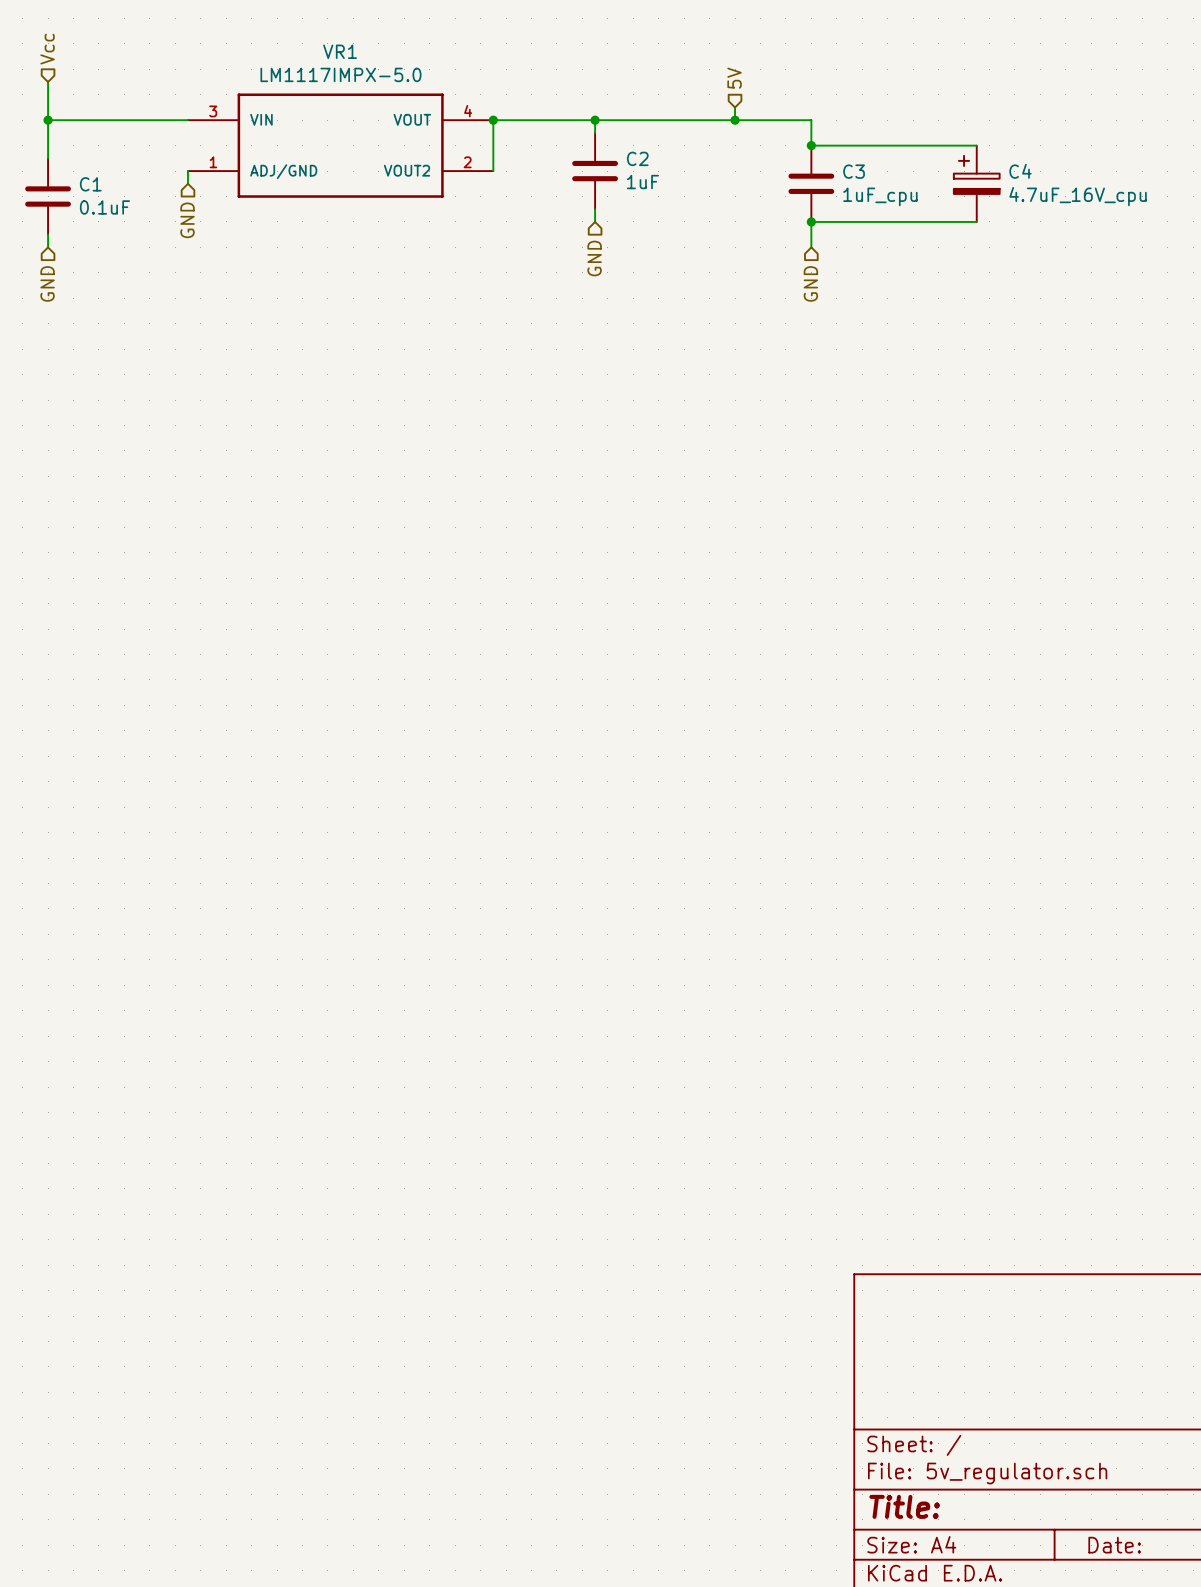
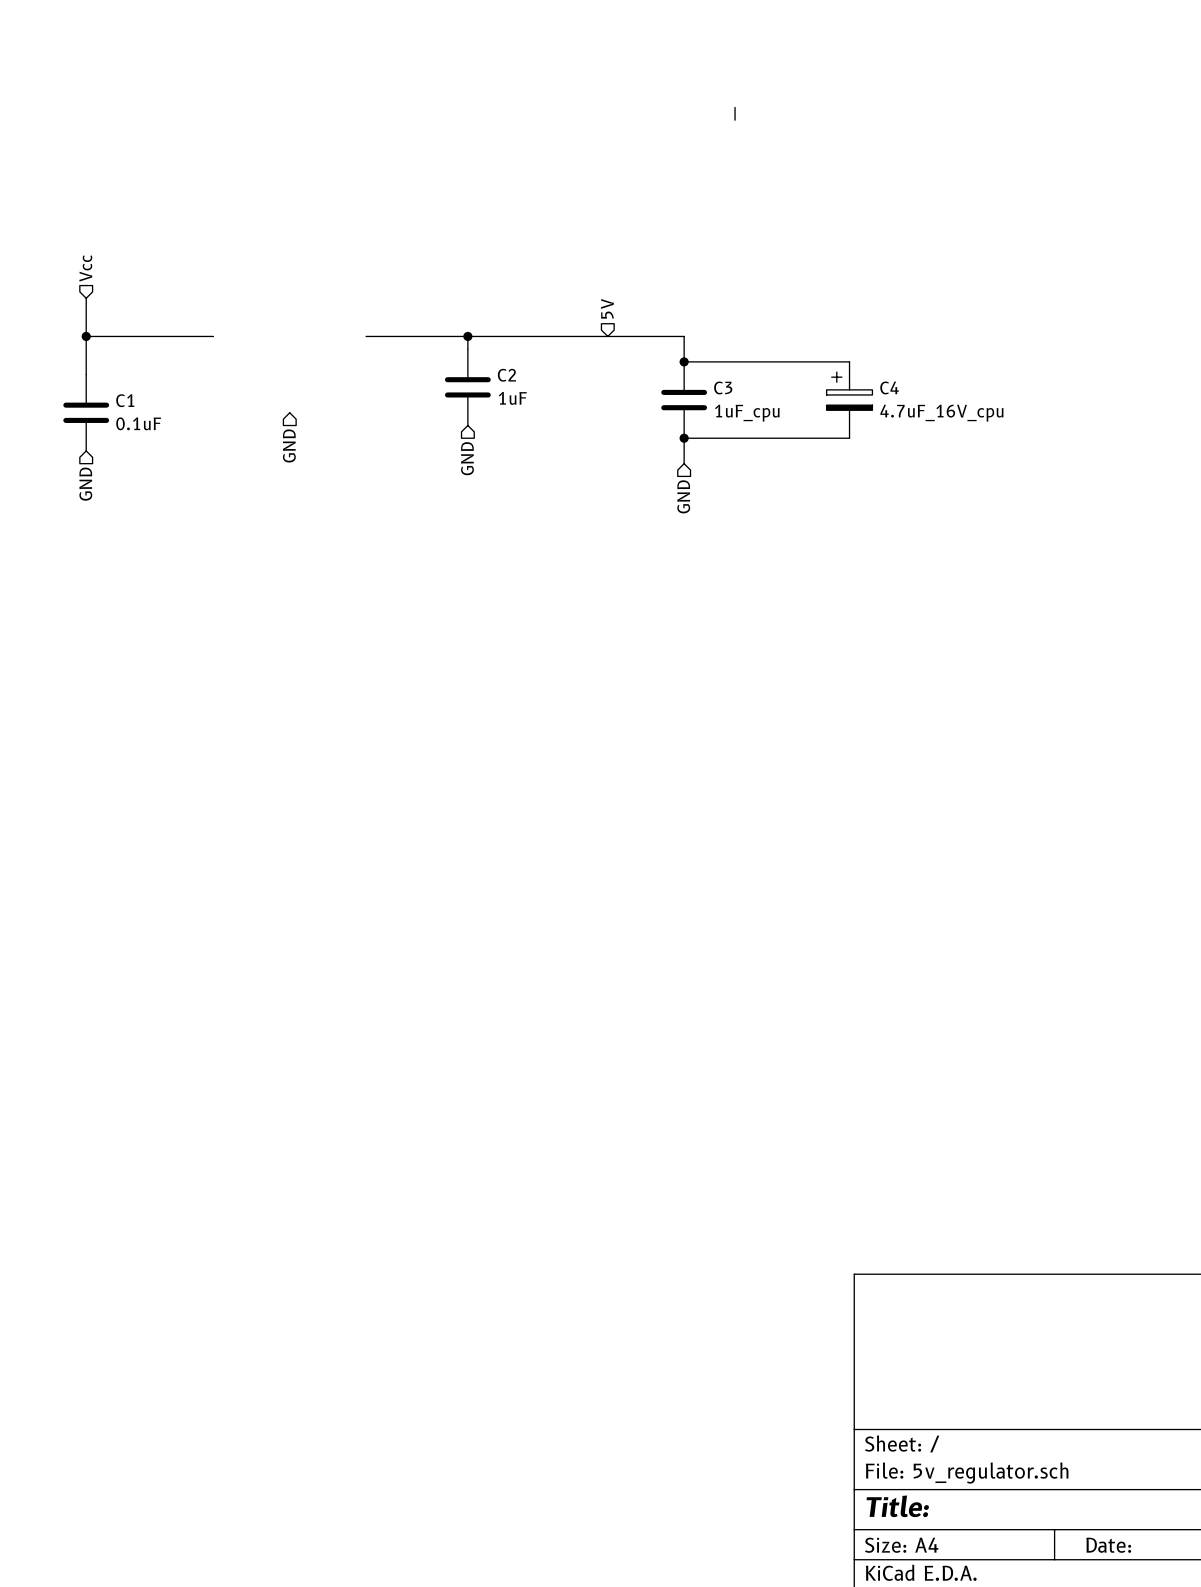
hierarchical label position: Vcc (47, 49) -> Vcc (85, 268)
hierarchical label: 5V (734, 78) -> none
wire: (48, 82) (48, 158) -> (86, 298) (86, 374)
wire: (48, 120) (187, 120) -> none
junction: (48, 120) -> none
junction: (493, 120) -> none
wire: (595, 120) (595, 132) -> none
junction: (595, 120) -> none
junction: (735, 120) -> none
VR1: LM1117IMPX-5.0 (340, 145) -> none
junction: (811, 145) -> none
wire: (976, 145) (811, 145) (811, 120) (493, 120) (493, 171) -> none
wire: (187, 171) (187, 183) -> none
C2 position: (595, 171) -> (467, 387)
C3 position: (811, 183) -> (684, 400)
C4 position: (976, 183) -> (849, 400)
C1 position: (48, 196) -> (86, 412)
wire: (595, 209) (595, 221) -> (467, 336) (467, 349)
hierarchical label: GND (187, 220) -> none
junction: (811, 221) -> none
wire: (976, 221) (811, 221) (811, 247) -> none
wire: (48, 234) (48, 247) -> none
hierarchical label: GND (594, 258) -> none
hierarchical label: GND (47, 283) -> none
hierarchical label: GND (810, 283) -> none
hierarchical label: none -> 5V (607, 308)
wire: none -> (86, 336) (213, 336)
junction: none -> (86, 336)
wire: none -> (366, 336) (684, 336) (684, 361) (849, 361)
junction: none -> (467, 336)
junction: none -> (684, 361)
junction: none -> (684, 438)
wire: none -> (849, 438) (684, 438) (684, 463)
hierarchical label: none -> GND (289, 445)
hierarchical label: none -> GND (467, 458)
hierarchical label: none -> GND (85, 484)
hierarchical label: none -> GND (683, 496)

